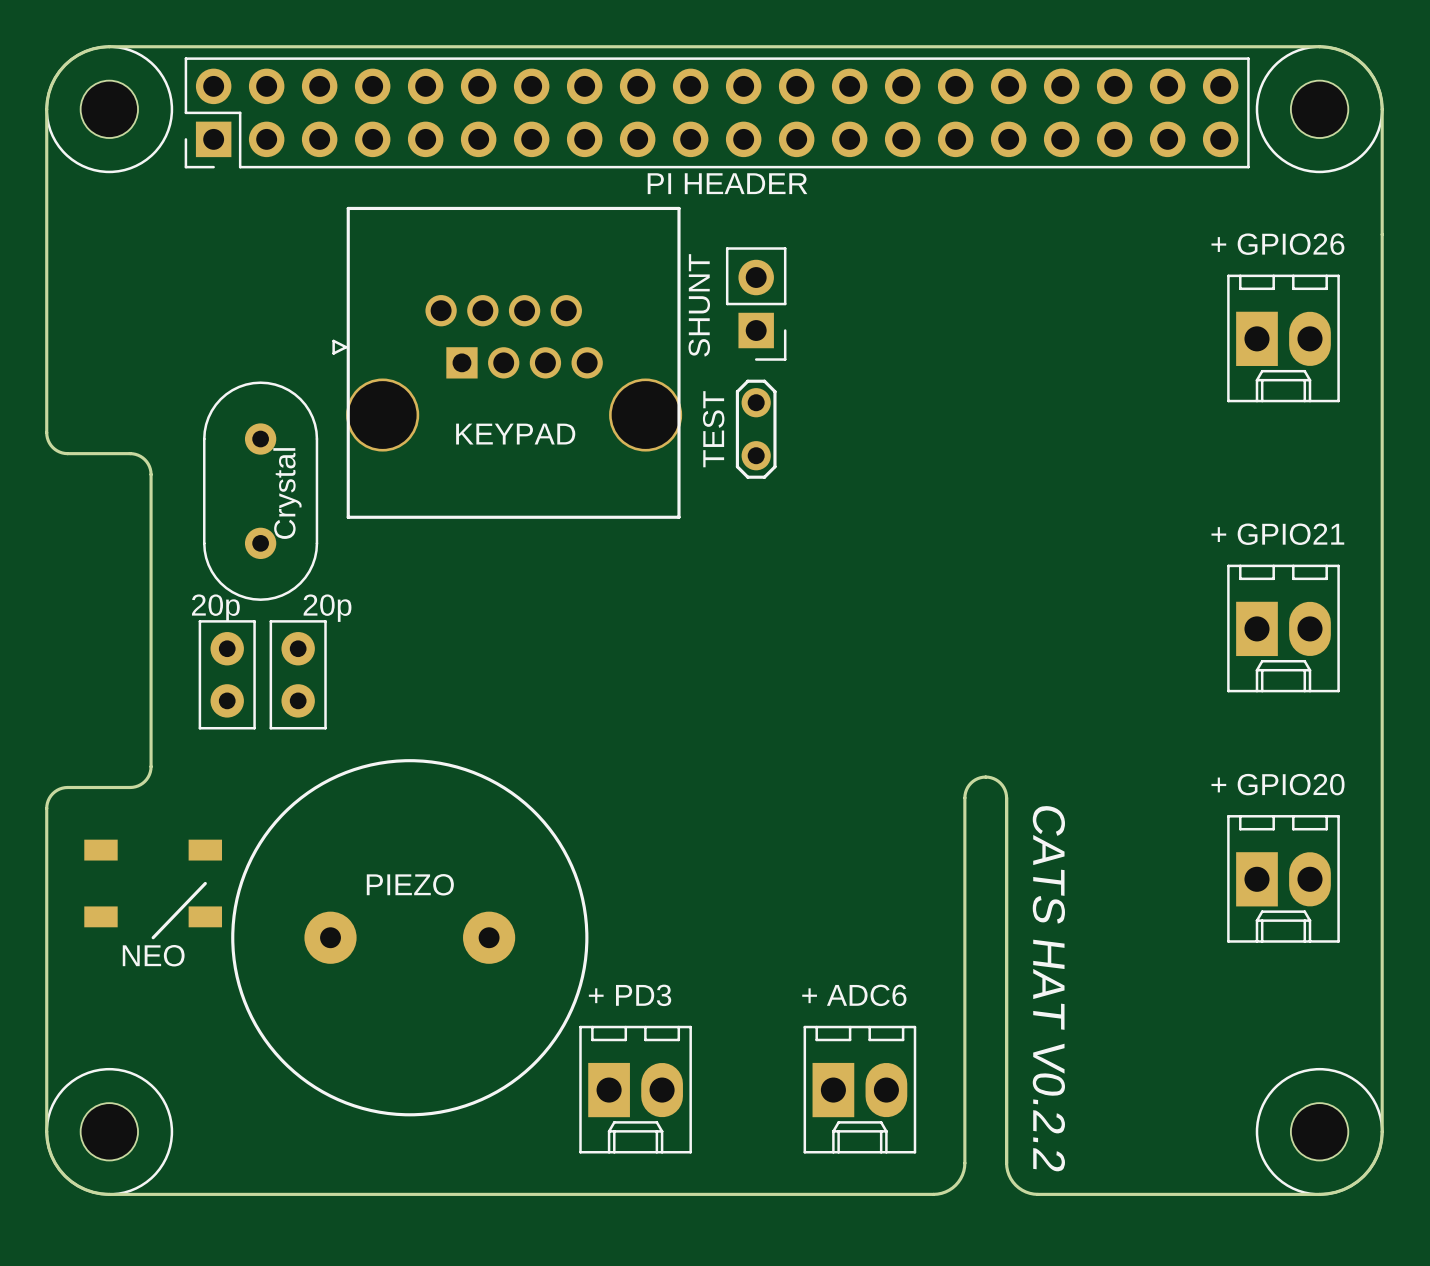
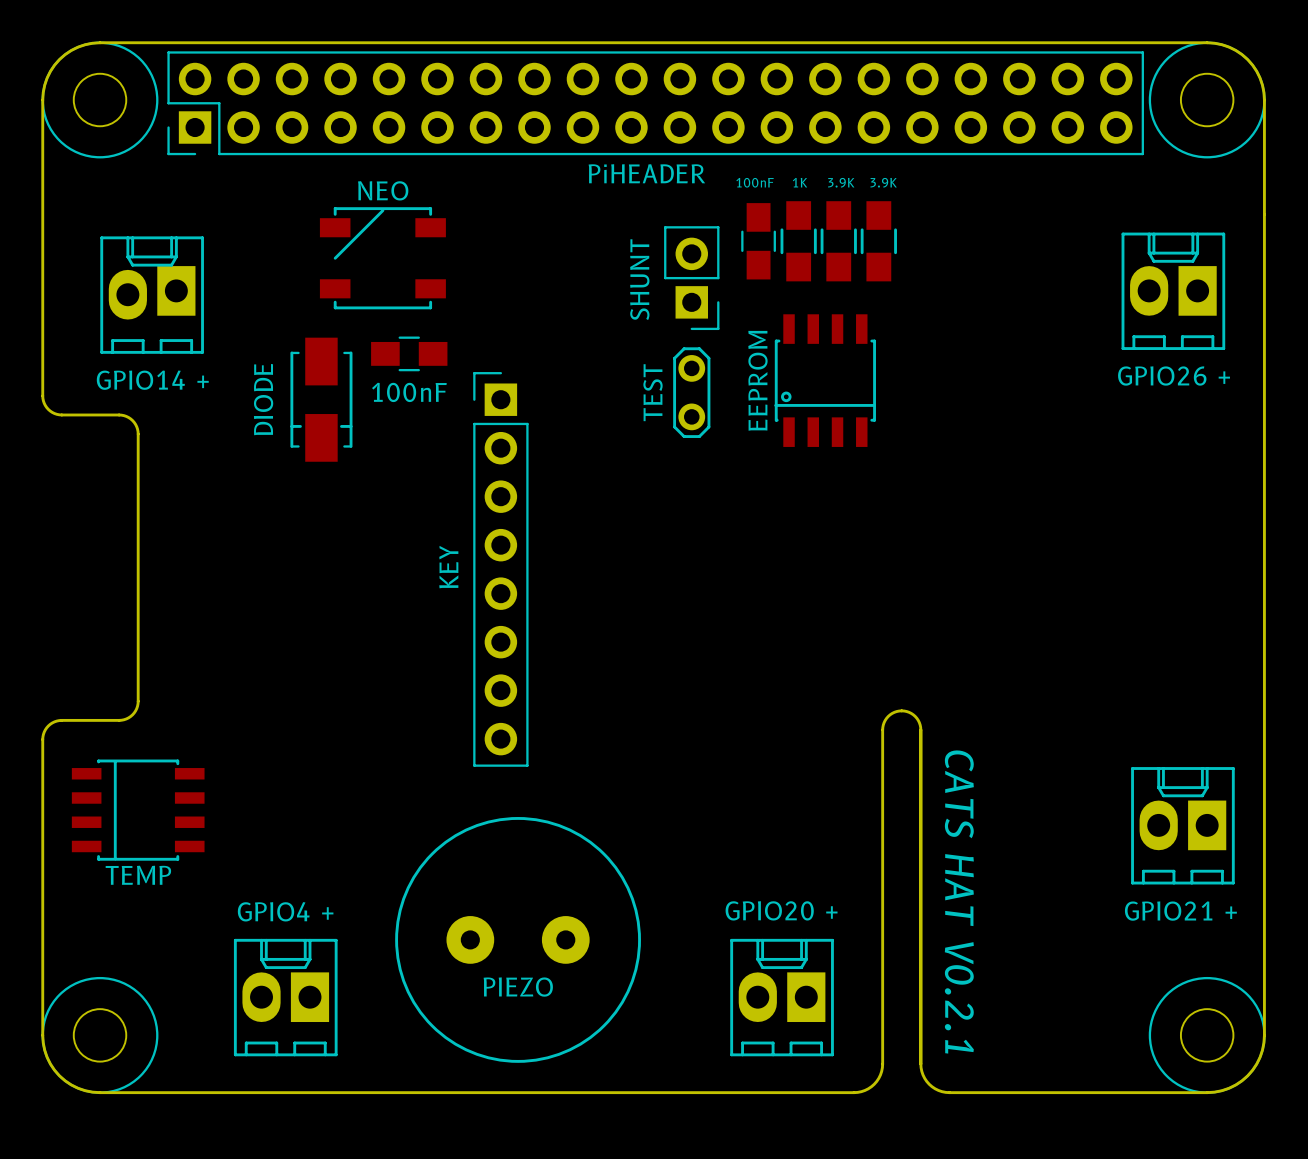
PiHEADER: none -> (655, 103)
PI HEADER: (717, 112) -> none
100nF: none -> (758, 241)
1K: none -> (798, 241)
3.9K: none -> (838, 241)
3.9K: none -> (878, 241)
NEO: none -> (382, 258)
GPIO26 +: none -> (1173, 291)
GPIO14 +: none -> (152, 295)
+ GPIO26: (1283, 338) -> none
KEYPAD: (507, 362) -> none
100nF: none -> (409, 353)
EEPROM: none -> (825, 380)
DIODE: none -> (321, 399)
Crystal: (260, 491) -> none
KEY: none -> (500, 569)
+ GPIO21: (1283, 628) -> none
20p: (227, 674) -> none
20p: (298, 674) -> none
+ GPIO20: (1283, 878) -> none
TEMP: none -> (138, 810)
NEO: (153, 889) -> none
GPIO21 +: none -> (1182, 825)
PIEZO: (409, 937) -> none
text: CATS HAT V0.2.2 (1048, 988) -> CATS HAT V0.2.1 (959, 901)
PIEZO: none -> (518, 939)
+ PD3: (635, 1089) -> none
+ ADC6: (859, 1089) -> none
GPIO4 +: none -> (285, 997)
GPIO20 +: none -> (782, 997)

